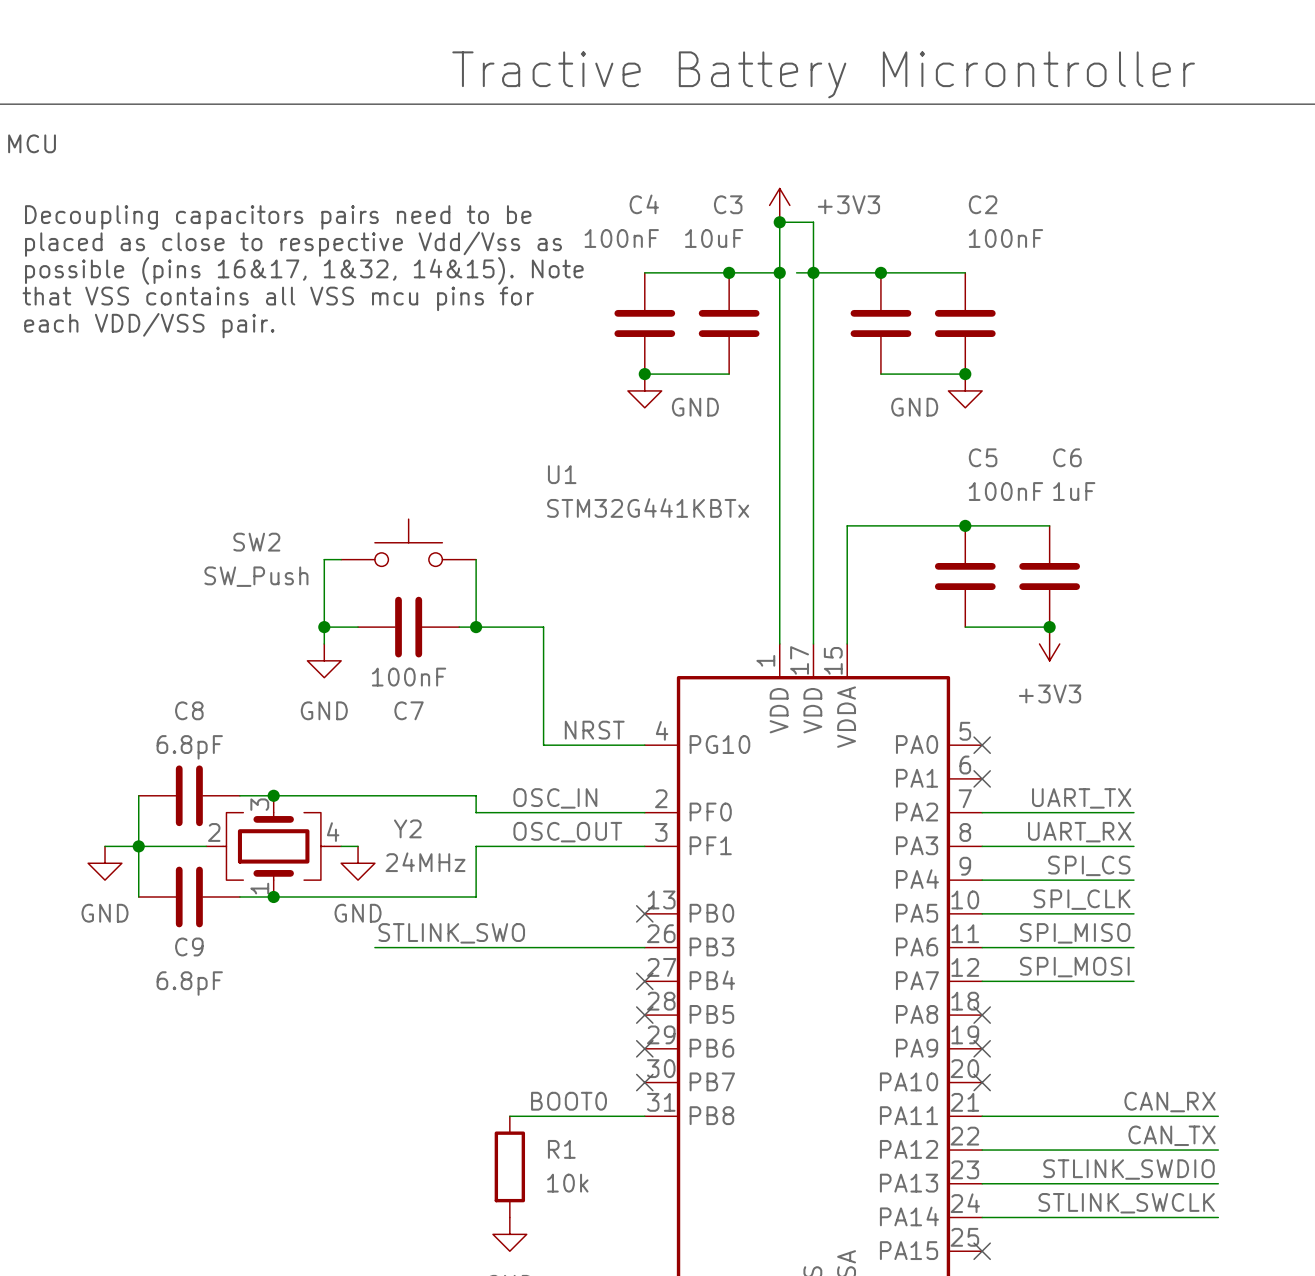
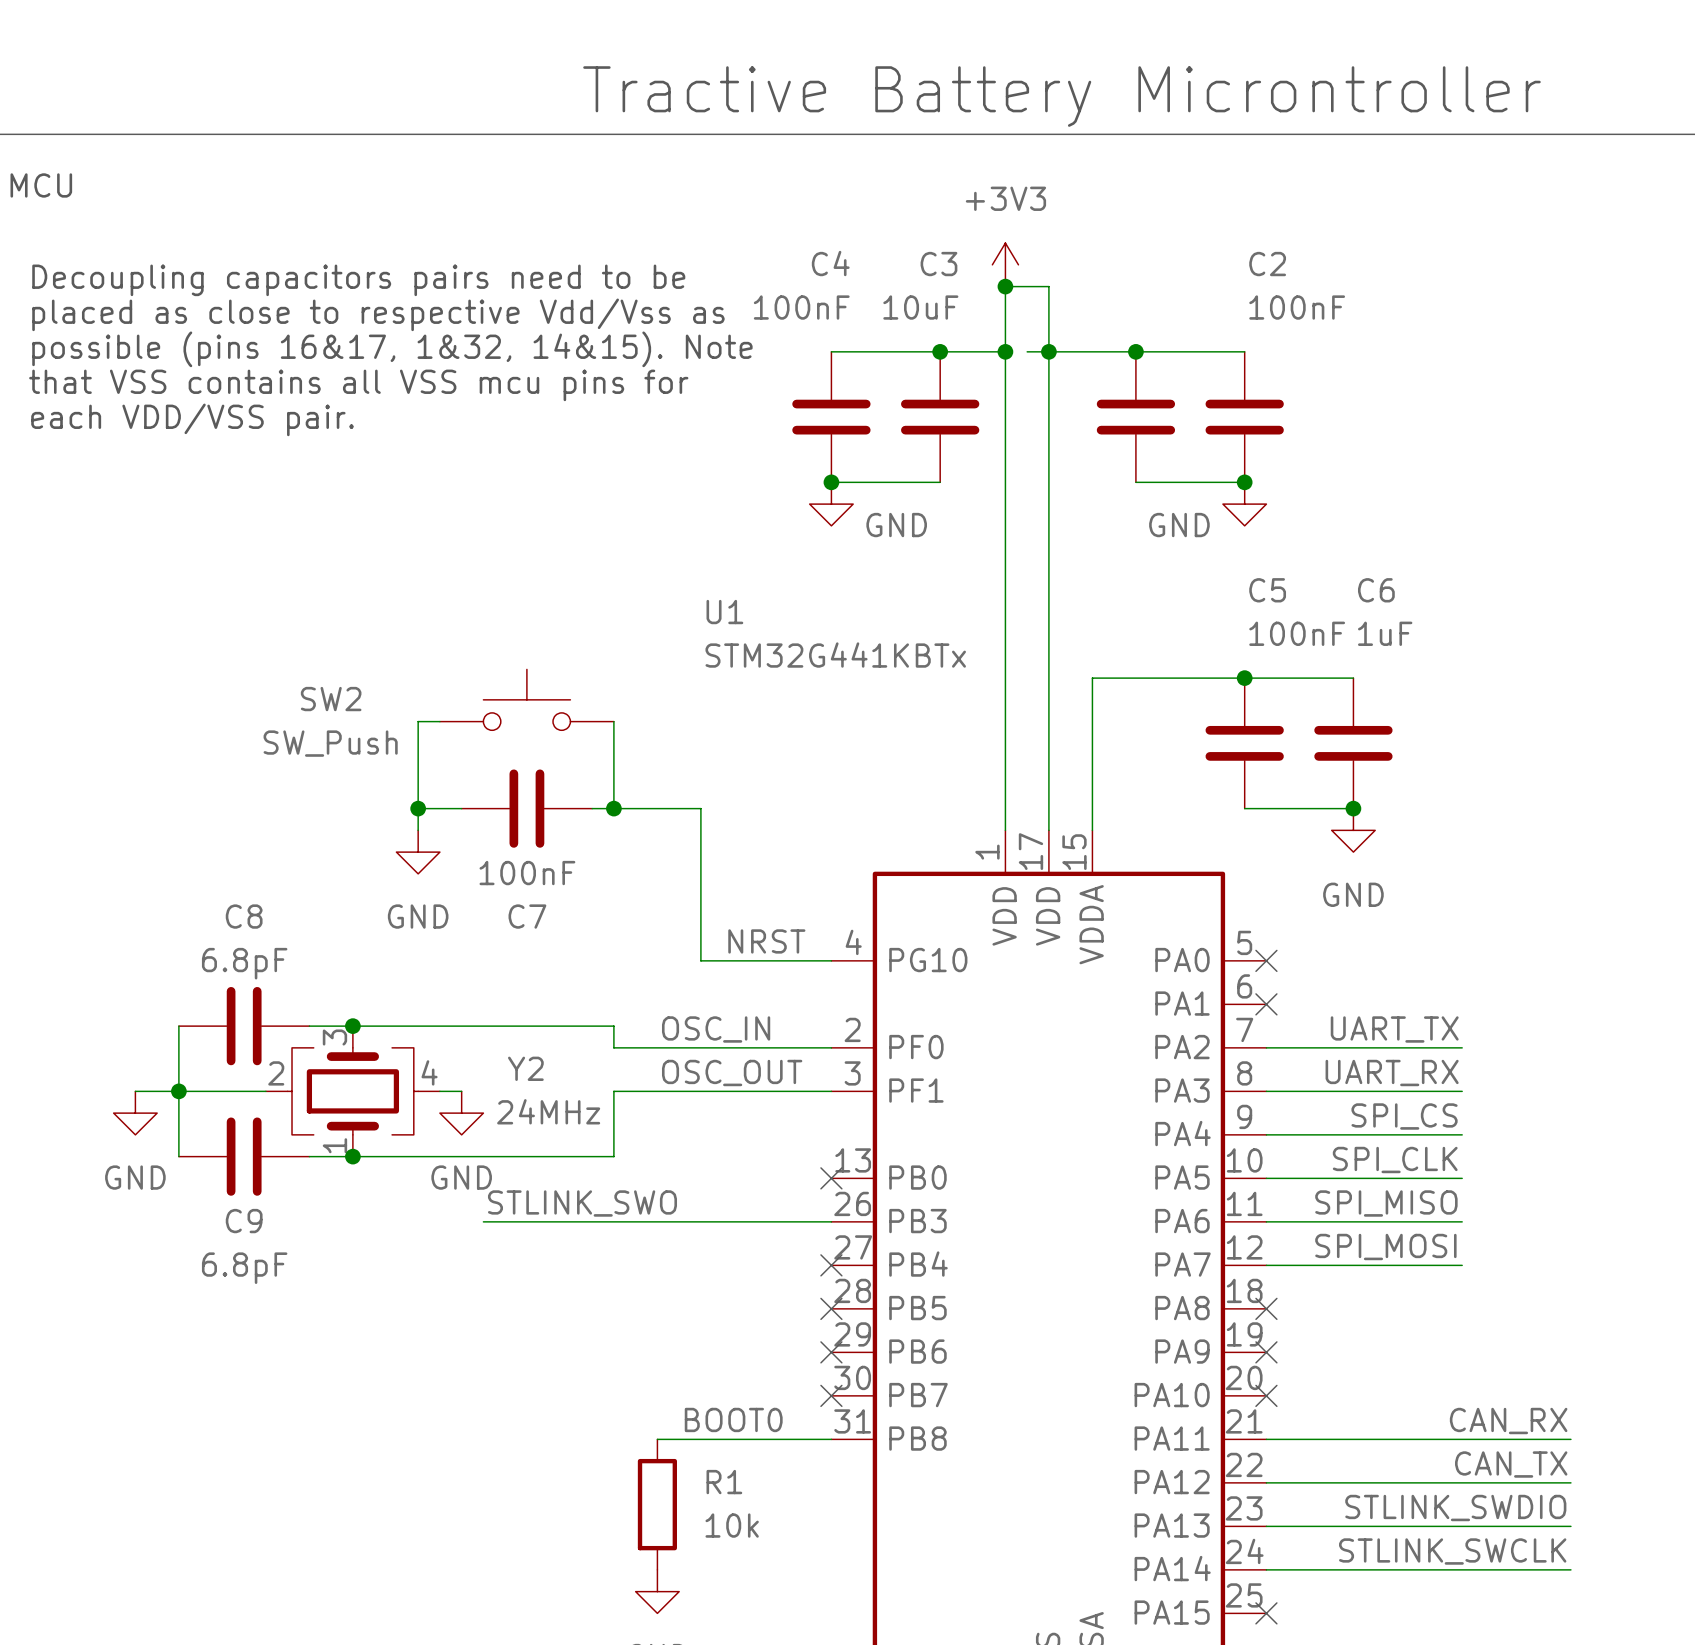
power symbol text position: +3V3 (848, 204) -> +3V3 (1005, 198)
power symbol: +3V3 (1049, 643) -> GND (1353, 830)

